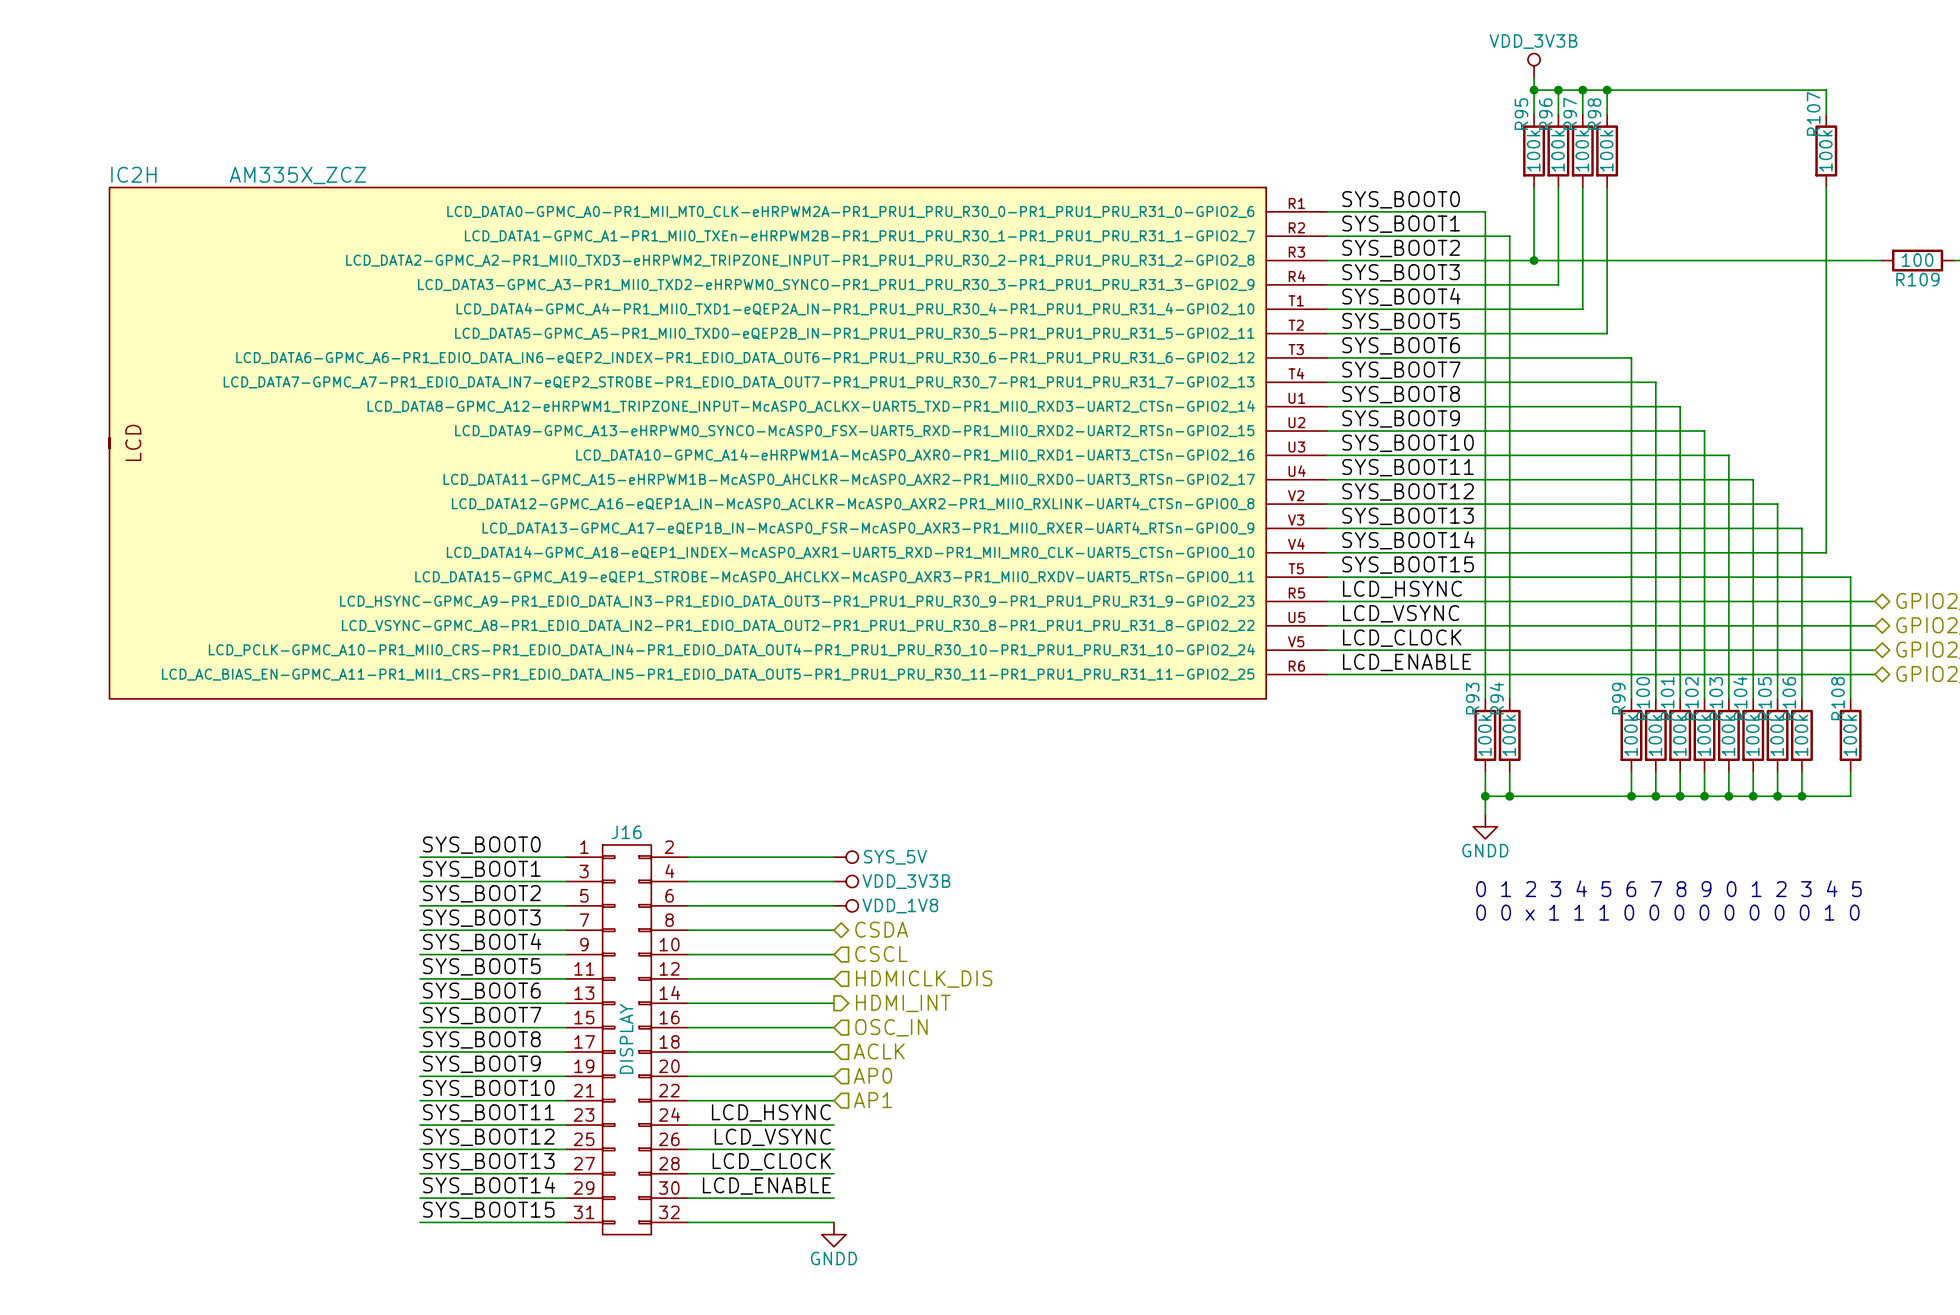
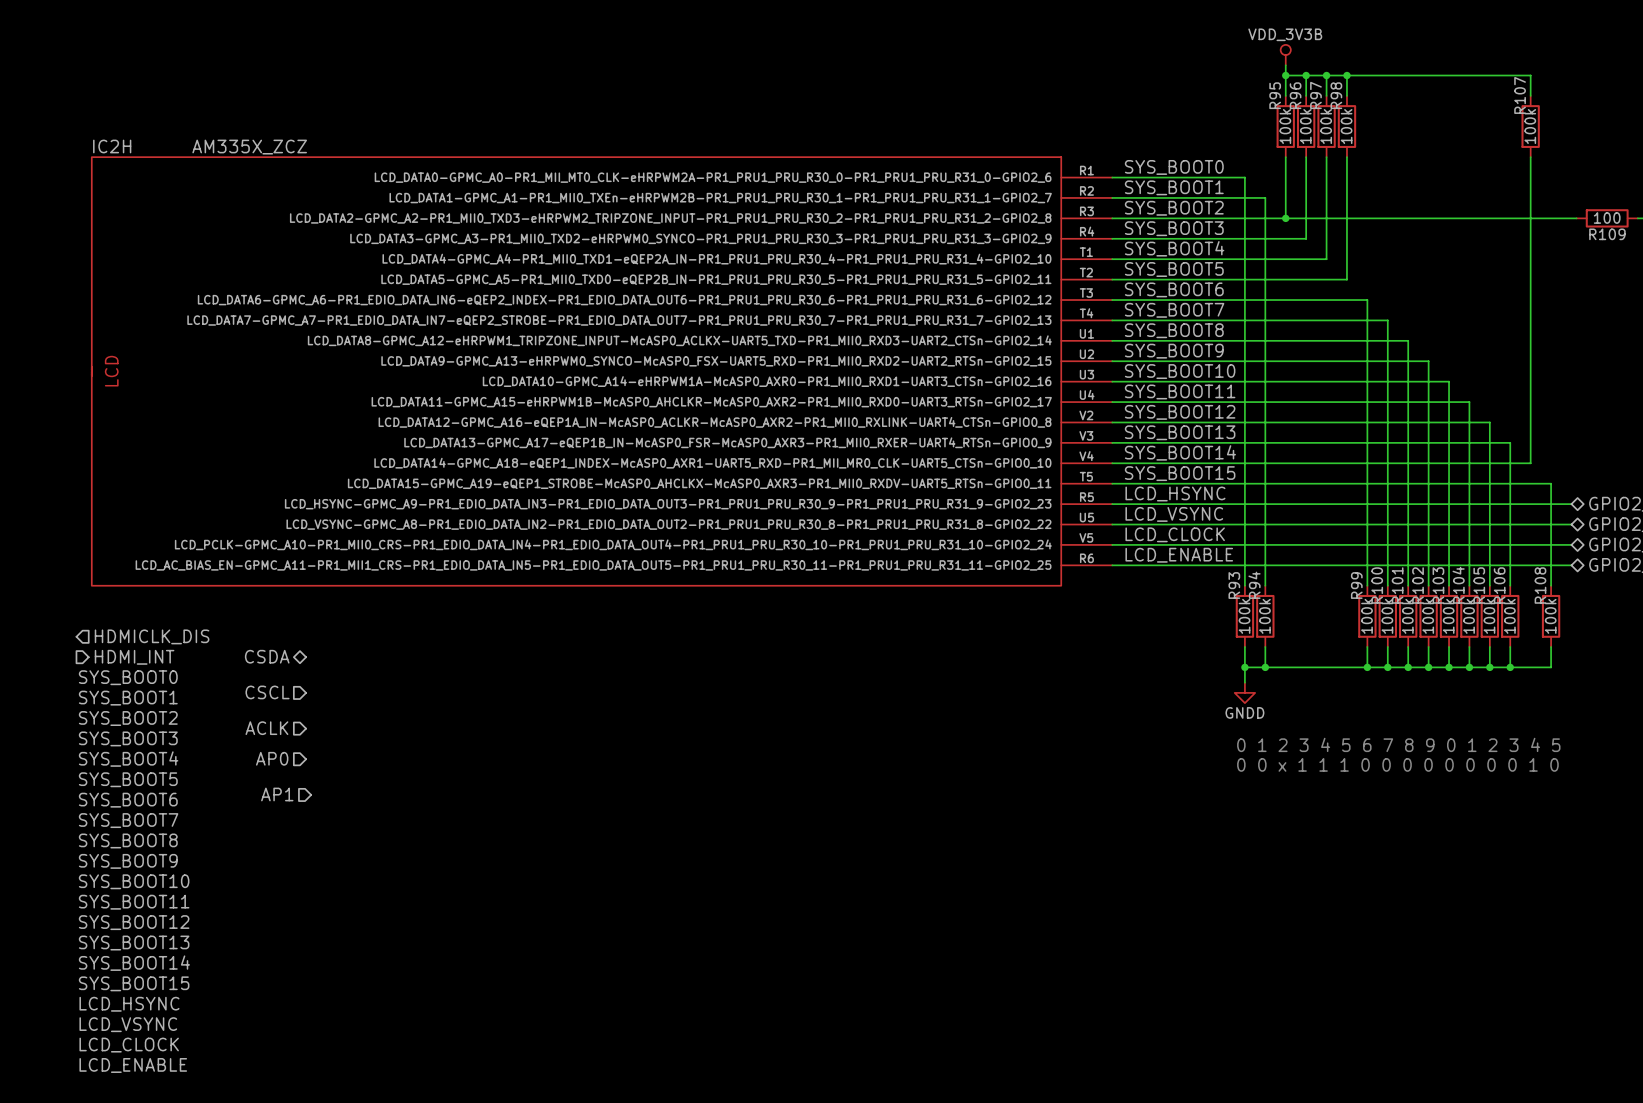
hierarchical label: none -> HDMICLK_DIS (152, 636)
hierarchical label: none -> CSDA (267, 656)
hierarchical label: none -> HDMI_INT (134, 657)
label: none -> SYS_BOOT0 (128, 677)
hierarchical label: none -> CSCL (267, 692)
label: none -> SYS_BOOT1 (128, 698)
label: SYS_BOOT0 (481, 845) -> none
label: none -> SYS_BOOT2 (128, 718)
wire: (419, 857) (566, 857) -> none
wire: (687, 857) (833, 857) -> none
power symbol: SYS_5V (846, 857) -> none
hierarchical label: none -> ACLK (266, 728)
label: SYS_BOOT1 (481, 869) -> none
label: none -> SYS_BOOT3 (128, 738)
wire: (419, 881) (566, 881) -> none
wire: (687, 881) (833, 881) -> none
power symbol: VDD_3V3B (846, 881) -> none
label: SYS_BOOT2 (481, 893) -> none
label: none -> SYS_BOOT4 (128, 759)
hierarchical label: none -> AP0 (272, 758)
wire: (419, 905) (566, 905) -> none
wire: (687, 905) (833, 905) -> none
power symbol: VDD_1V8 (846, 905) -> none
label: SYS_BOOT3 (481, 918) -> none
hierarchical label: CSDA (881, 929) -> none
label: none -> SYS_BOOT5 (128, 779)
wire: (419, 930) (566, 930) -> none
wire: (687, 930) (833, 930) -> none
label: SYS_BOOT4 (482, 942) -> none
hierarchical label: none -> AP1 (277, 794)
label: none -> SYS_BOOT6 (128, 800)
wire: (419, 954) (566, 954) -> none
wire: (687, 954) (833, 954) -> none
hierarchical label: CSCL (881, 954) -> none
label: SYS_BOOT5 (481, 966) -> none
wire: (419, 978) (566, 978) -> none
wire: (687, 978) (833, 978) -> none
label: none -> SYS_BOOT7 (128, 820)
hierarchical label: HDMICLK_DIS (924, 979) -> none
label: SYS_BOOT6 (481, 991) -> none
label: none -> SYS_BOOT8 (128, 840)
wire: (419, 1003) (566, 1003) -> none
wire: (687, 1003) (833, 1003) -> none
hierarchical label: HDMI_INT (903, 1003) -> none
label: SYS_BOOT7 (482, 1015) -> none
label: none -> SYS_BOOT9 (128, 861)
wire: (419, 1027) (566, 1027) -> none
wire: (687, 1027) (833, 1027) -> none
hierarchical label: OSC_IN (891, 1027) -> none
label: SYS_BOOT8 (481, 1039) -> none
J16: DISPLAY (626, 1039) -> none
wire: (419, 1051) (566, 1051) -> none
wire: (687, 1051) (833, 1051) -> none
hierarchical label: ACLK (879, 1051) -> none
label: none -> SYS_BOOT10 (134, 881)
label: SYS_BOOT9 (481, 1064) -> none
hierarchical label: AP0 (873, 1075) -> none
label: none -> SYS_BOOT11 (134, 902)
wire: (419, 1076) (566, 1076) -> none
wire: (687, 1076) (833, 1076) -> none
label: SYS_BOOT10 (488, 1088) -> none
label: none -> SYS_BOOT12 (134, 922)
wire: (419, 1100) (566, 1100) -> none
wire: (687, 1100) (833, 1100) -> none
hierarchical label: AP1 (873, 1100) -> none
label: SYS_BOOT11 (488, 1112) -> none
label: LCD_HSYNC (771, 1112) -> none
label: none -> SYS_BOOT13 (134, 943)
wire: (419, 1125) (566, 1125) -> none
wire: (687, 1125) (833, 1125) -> none
label: SYS_BOOT12 (488, 1137) -> none
label: LCD_VSYNC (772, 1137) -> none
label: none -> SYS_BOOT14 (134, 963)
wire: (419, 1149) (566, 1149) -> none
wire: (687, 1149) (833, 1149) -> none
label: SYS_BOOT13 (488, 1161) -> none
label: LCD_CLOCK (771, 1161) -> none
label: none -> SYS_BOOT15 (134, 983)
wire: (419, 1173) (566, 1173) -> none
wire: (687, 1173) (833, 1173) -> none
label: SYS_BOOT14 (489, 1185) -> none
label: LCD_ENABLE (766, 1186) -> none
label: none -> LCD_HSYNC (129, 1004)
wire: (419, 1198) (566, 1198) -> none
wire: (687, 1198) (833, 1198) -> none
label: SYS_BOOT15 (488, 1210) -> none
label: none -> LCD_VSYNC (128, 1024)
wire: (419, 1222) (566, 1222) -> none
wire: (687, 1222) (833, 1222) -> none
power symbol: GNDD (833, 1234) -> none
label: none -> LCD_CLOCK (129, 1045)
label: none -> LCD_ENABLE (133, 1065)

